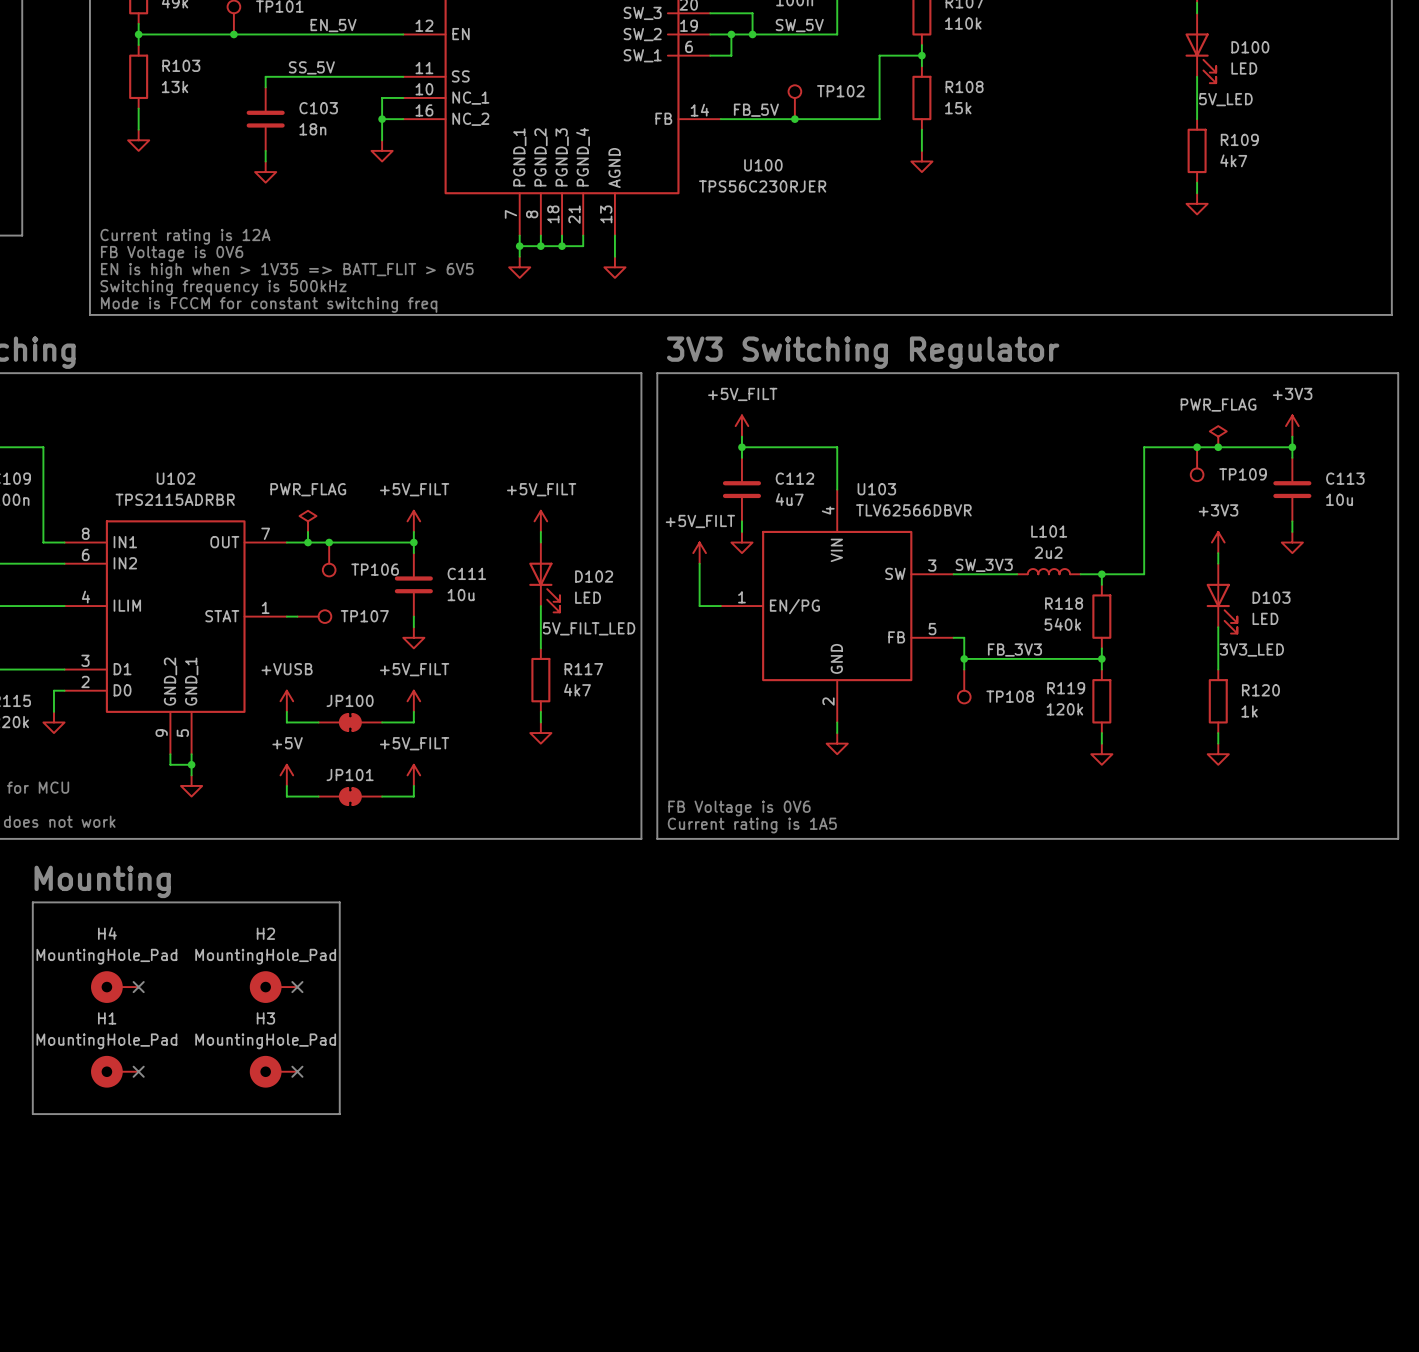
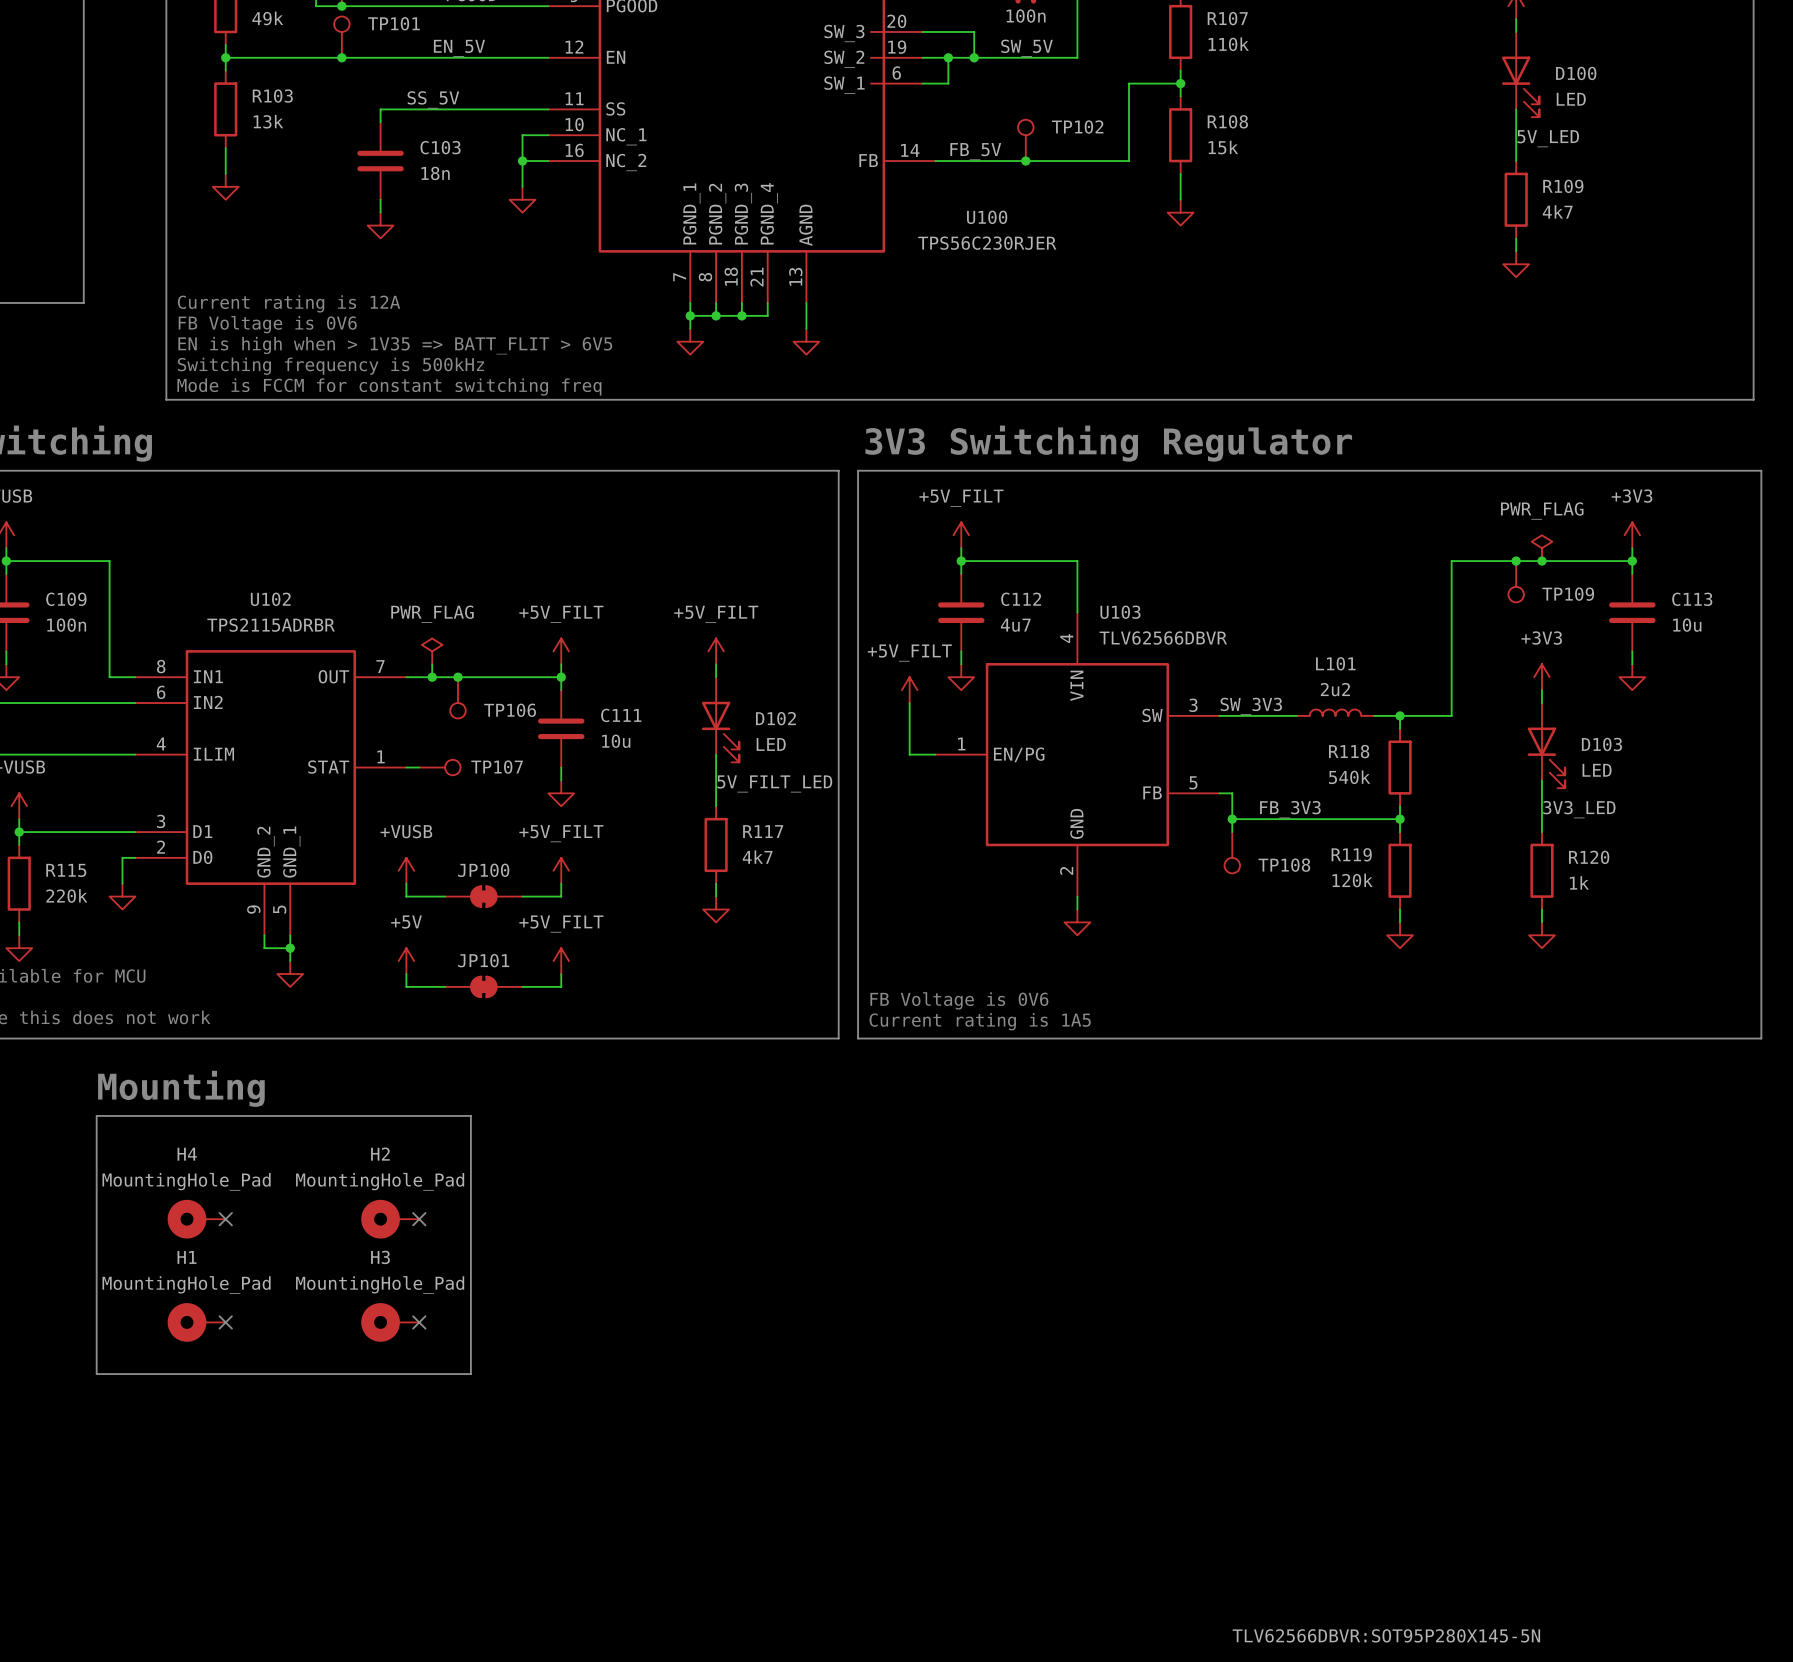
U103 text: none -> TLV62566DBVR:SOT95P280X145-5N (1386, 1635)

